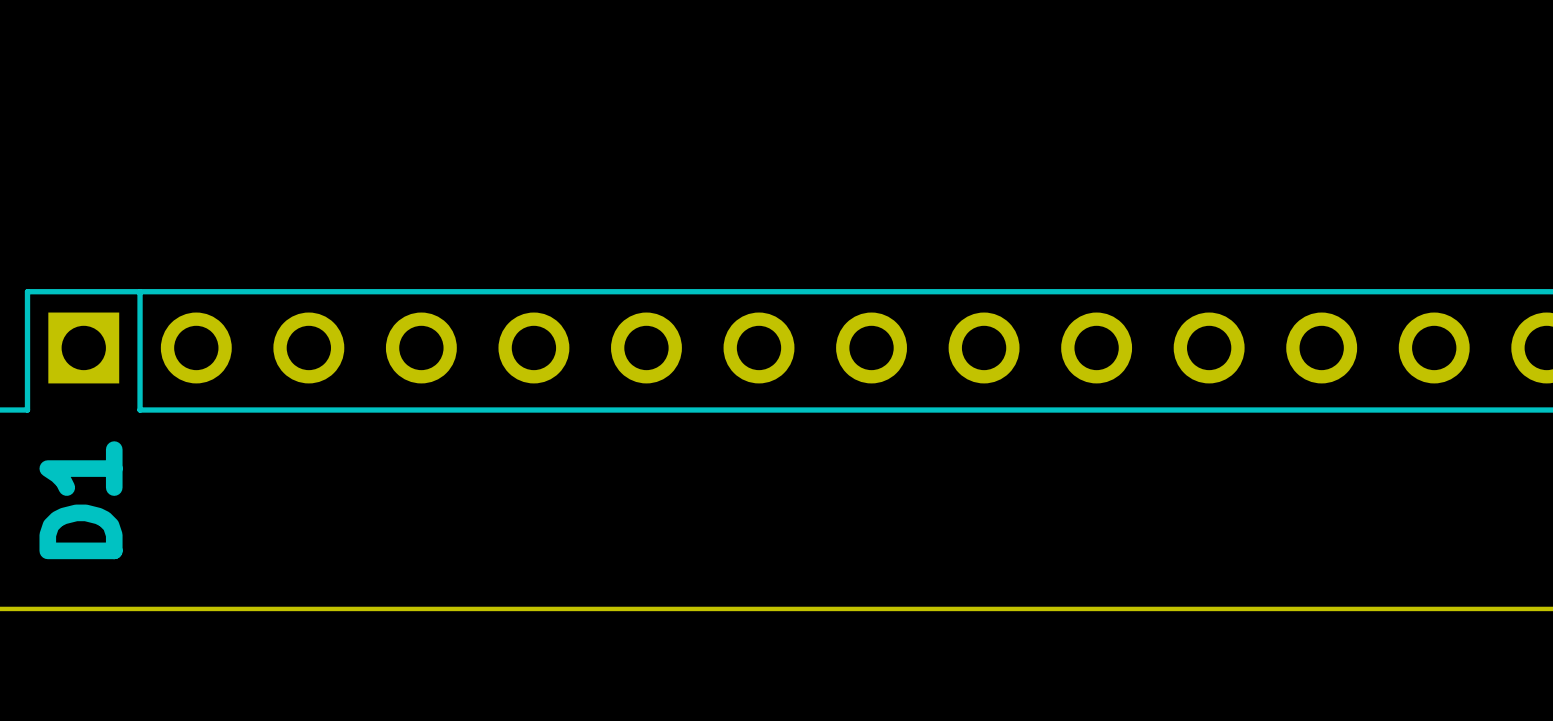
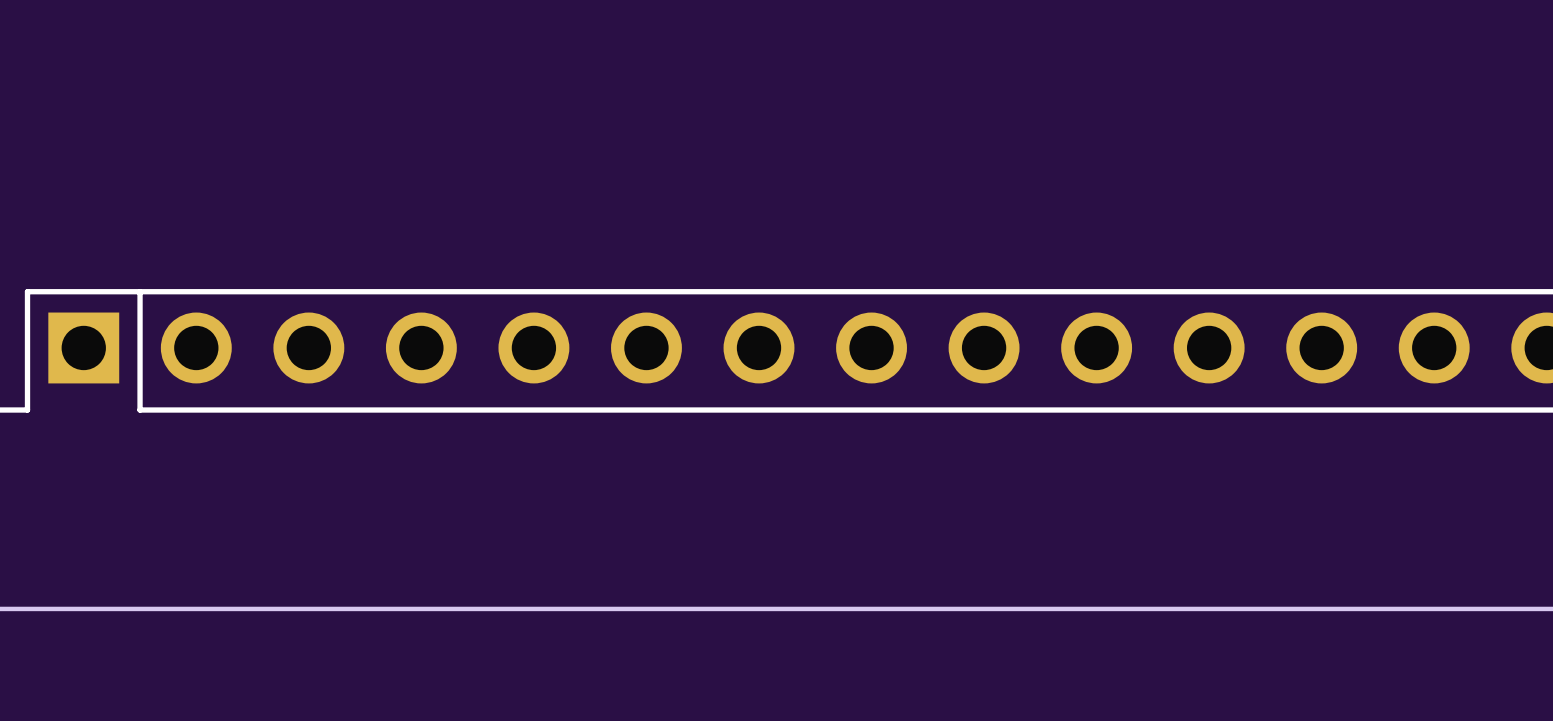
text: D1 (81, 500) -> none

